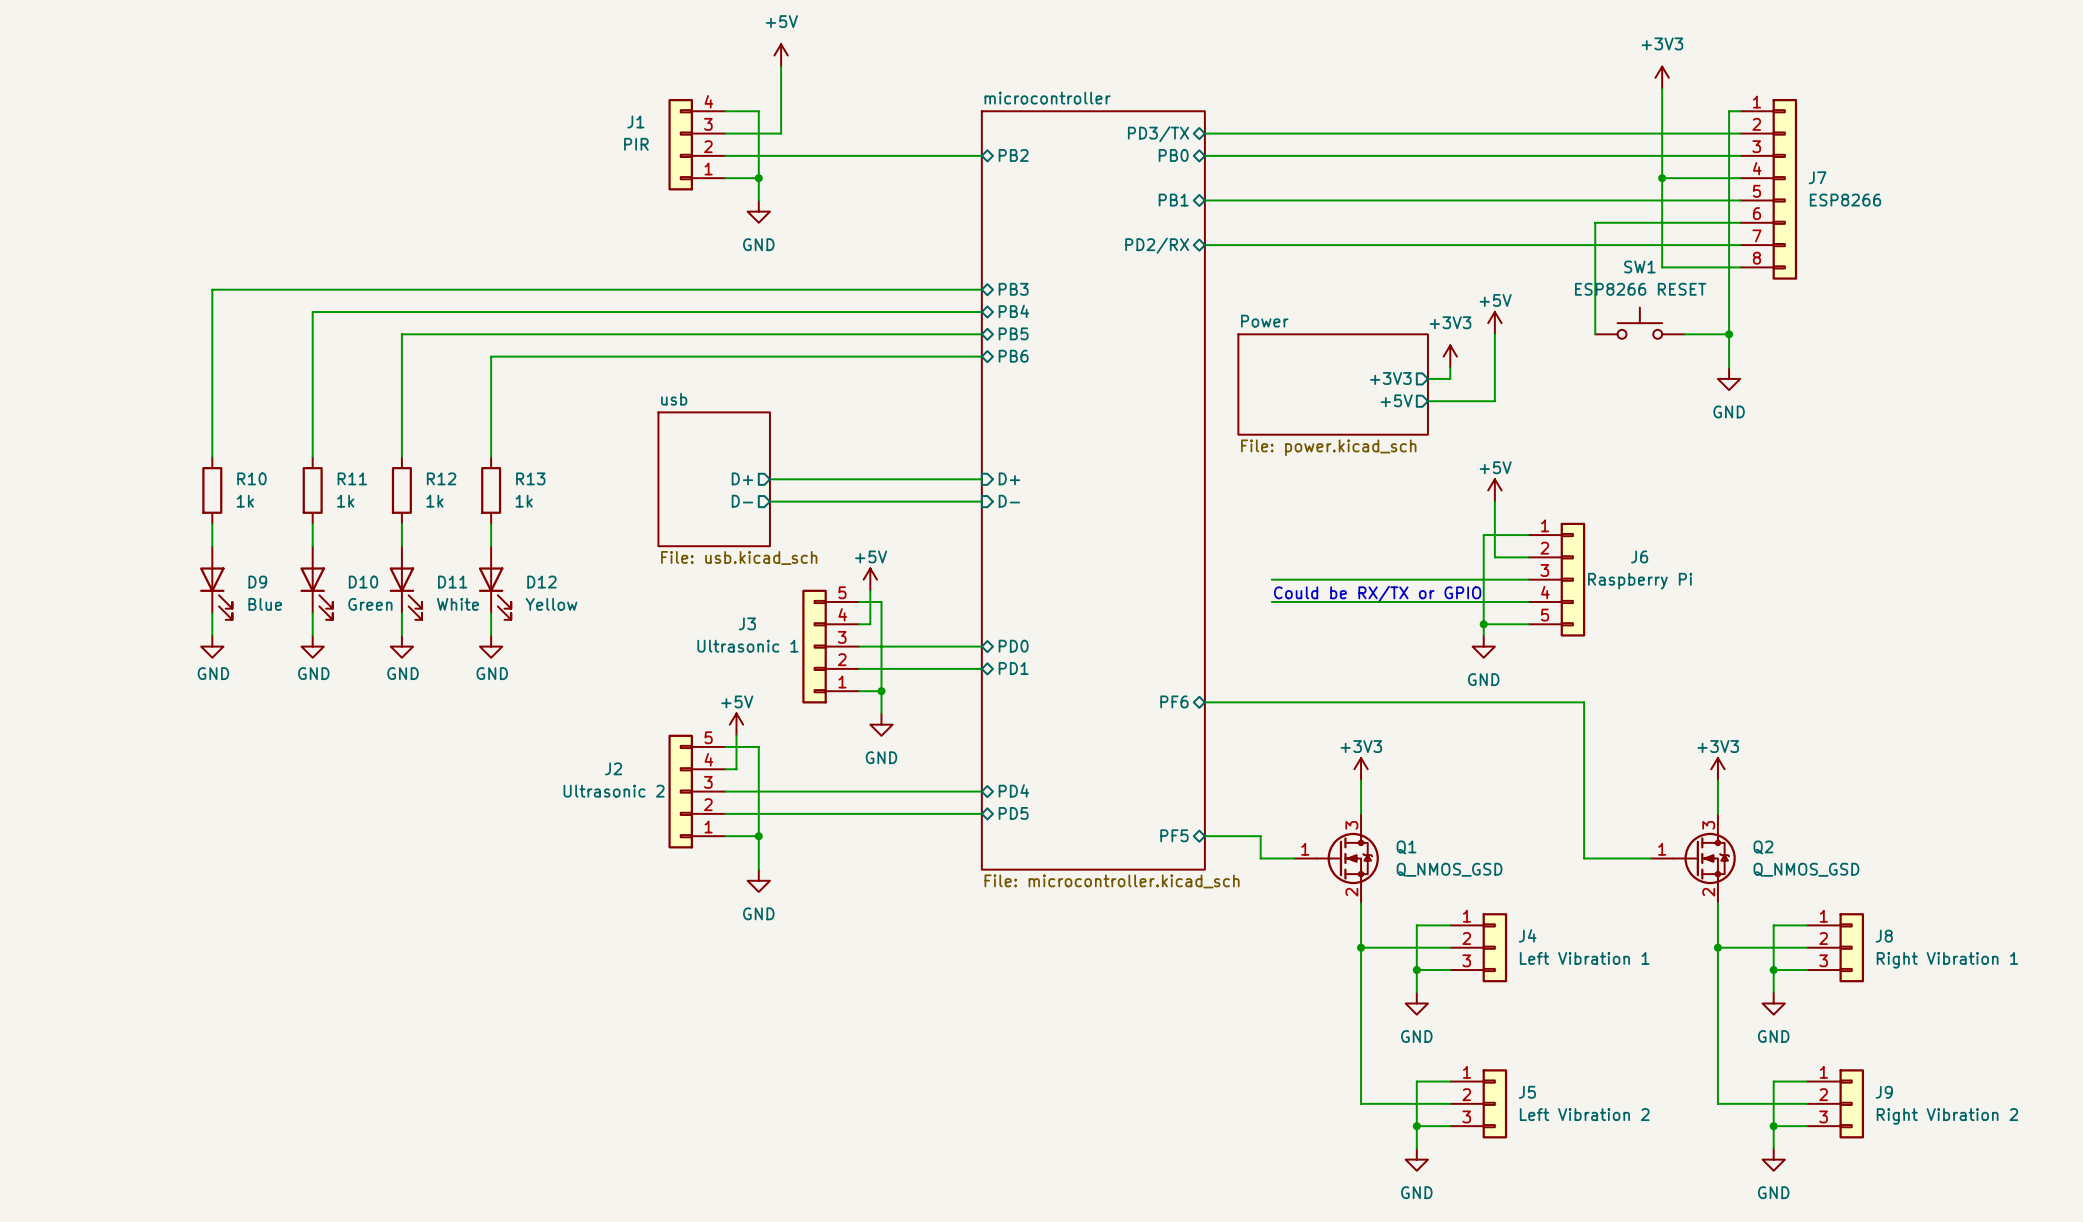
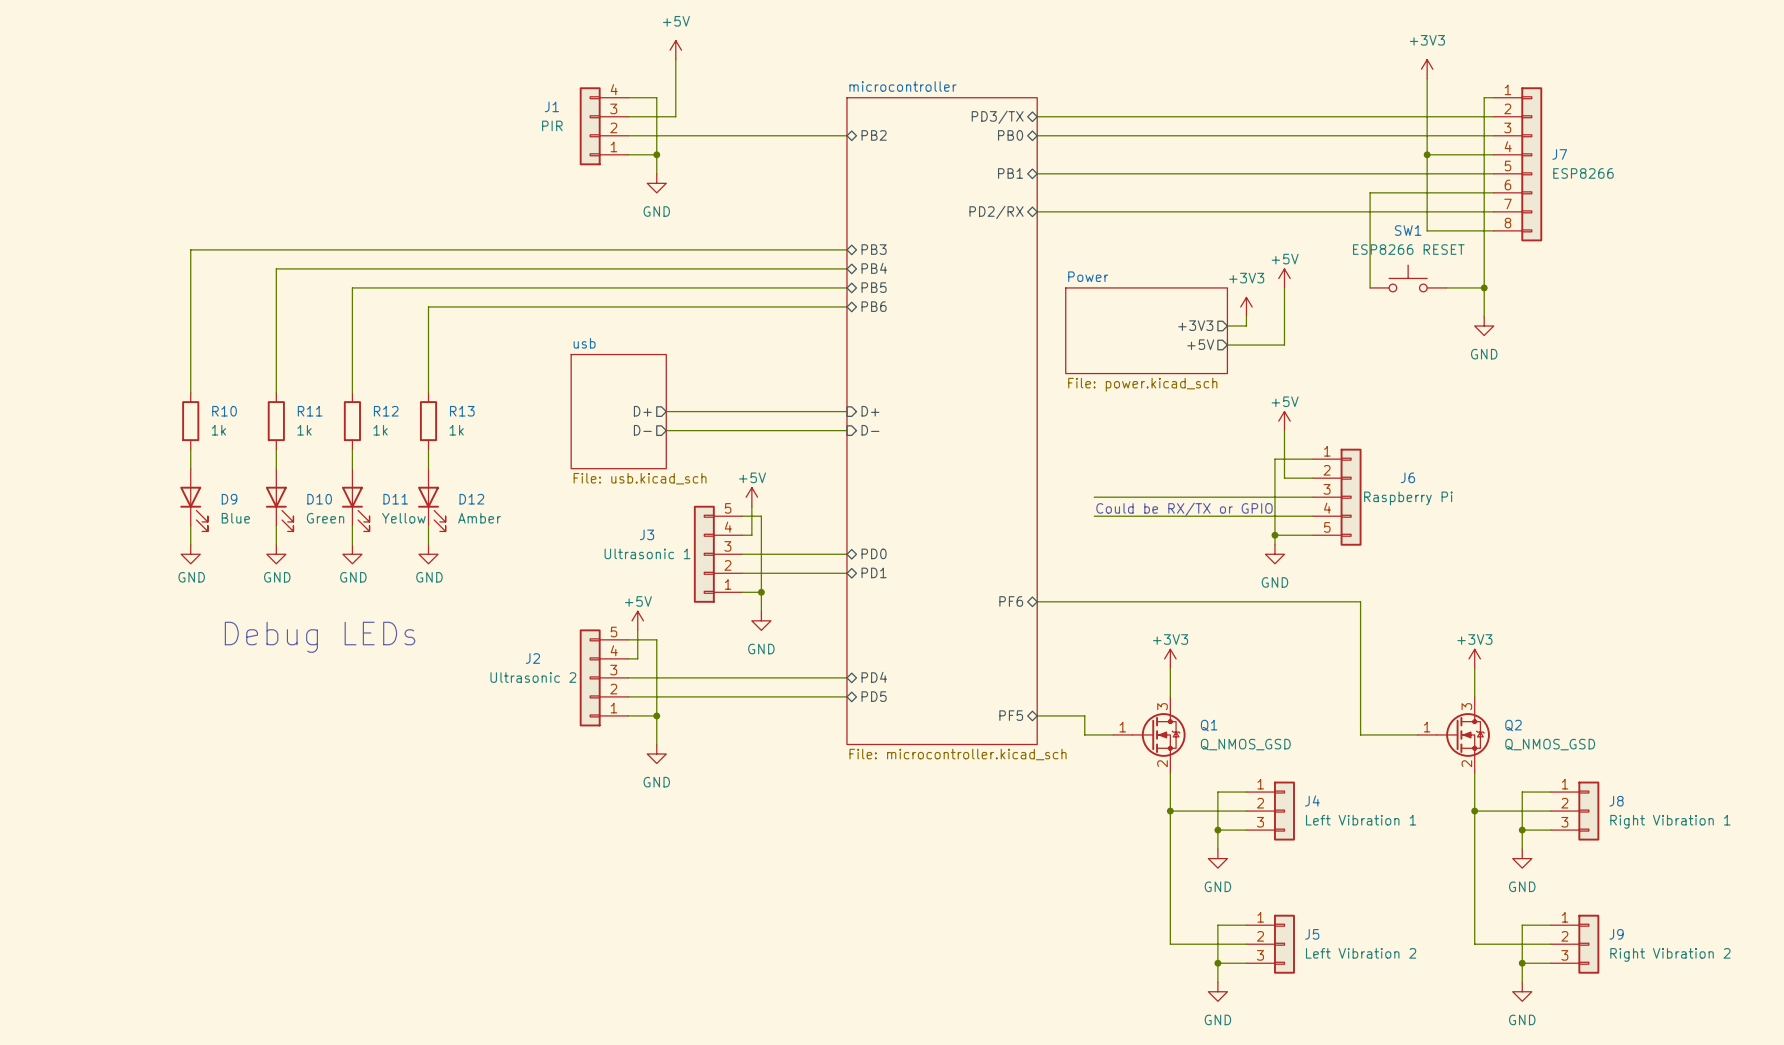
D11 value: White (458, 604) -> Yellow (403, 518)
D12 value: Yellow (551, 604) -> Amber (479, 518)
text: none -> Debug LEDs (320, 637)

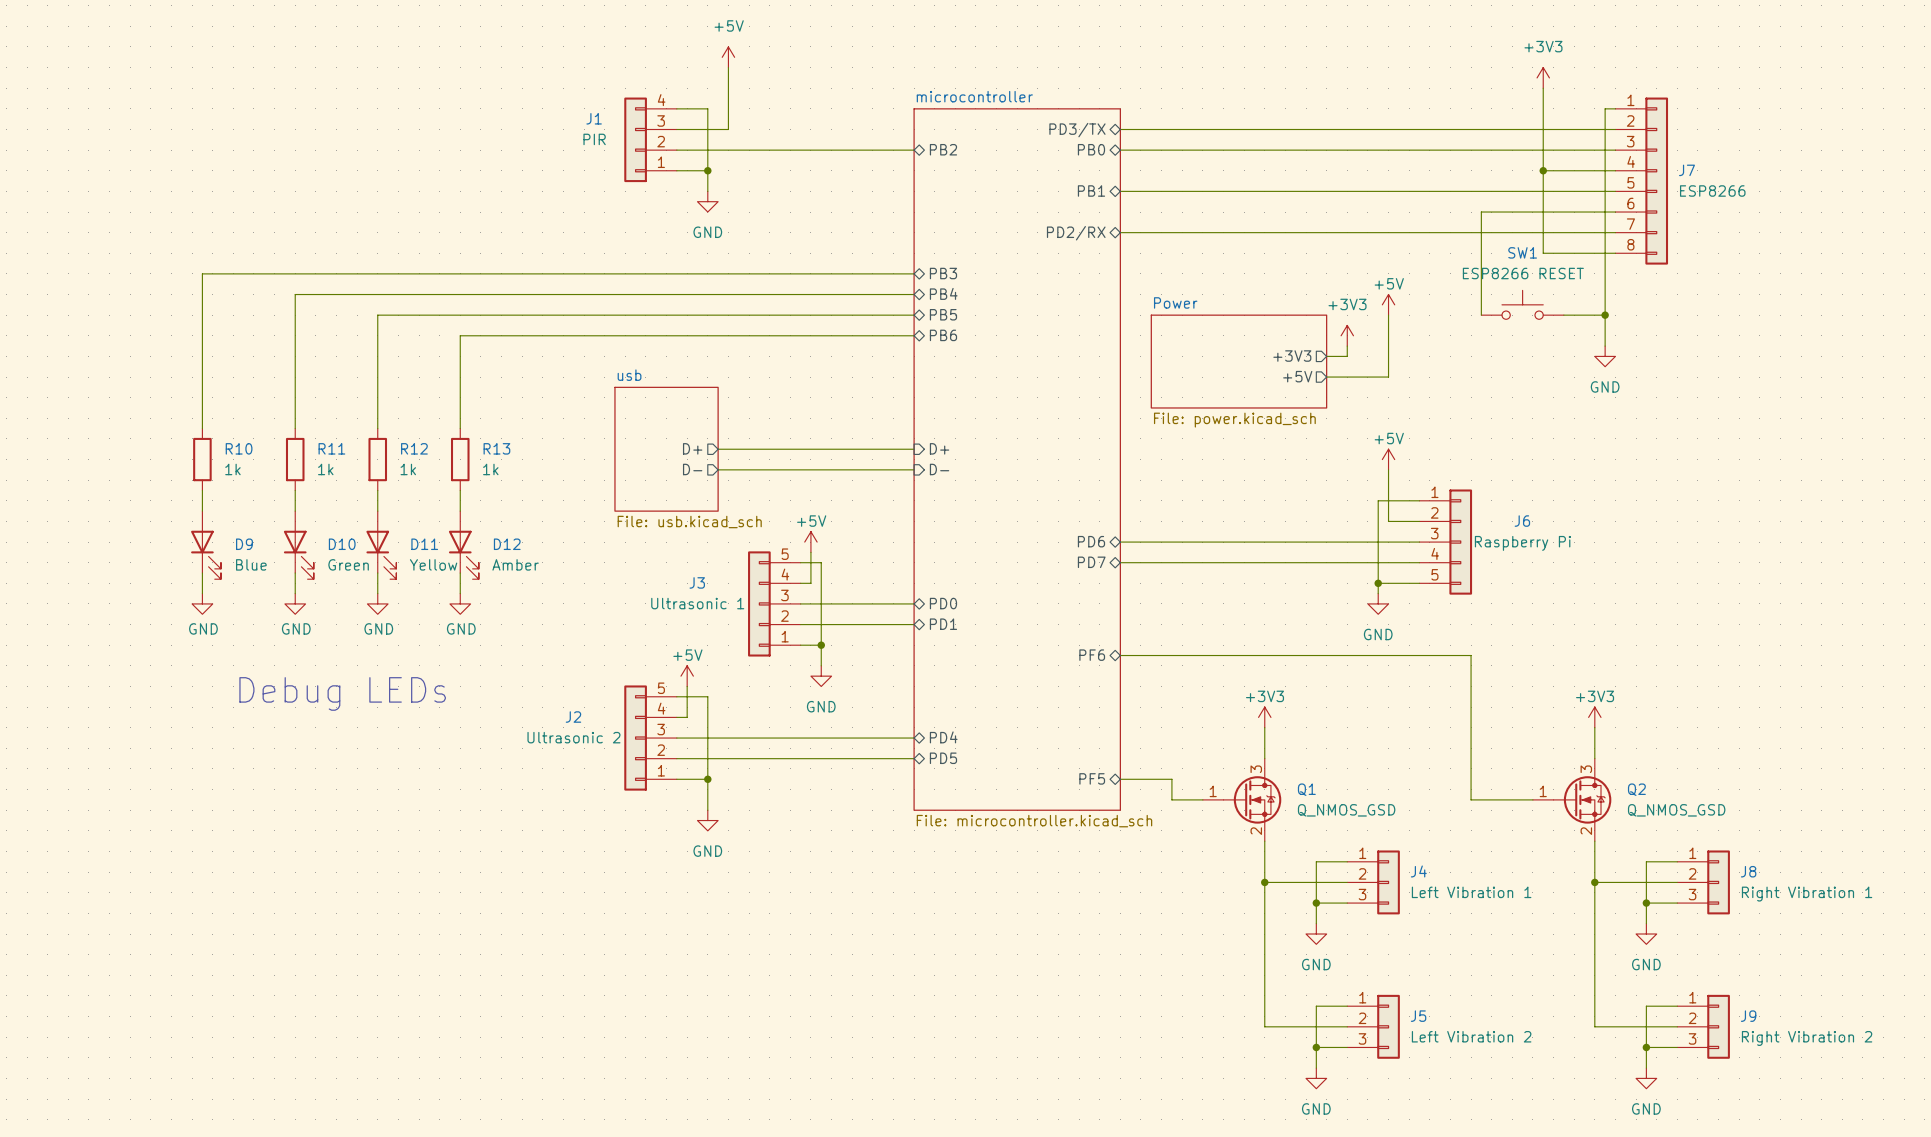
sheet pin: none -> PD6 (1091, 541)
wire: none -> (1120, 542) (1182, 542)
text: Could be RX/TX or GPIO (1184, 509) -> none
sheet pin: none -> PD7 (1091, 562)
wire: none -> (1120, 562) (1182, 562)

